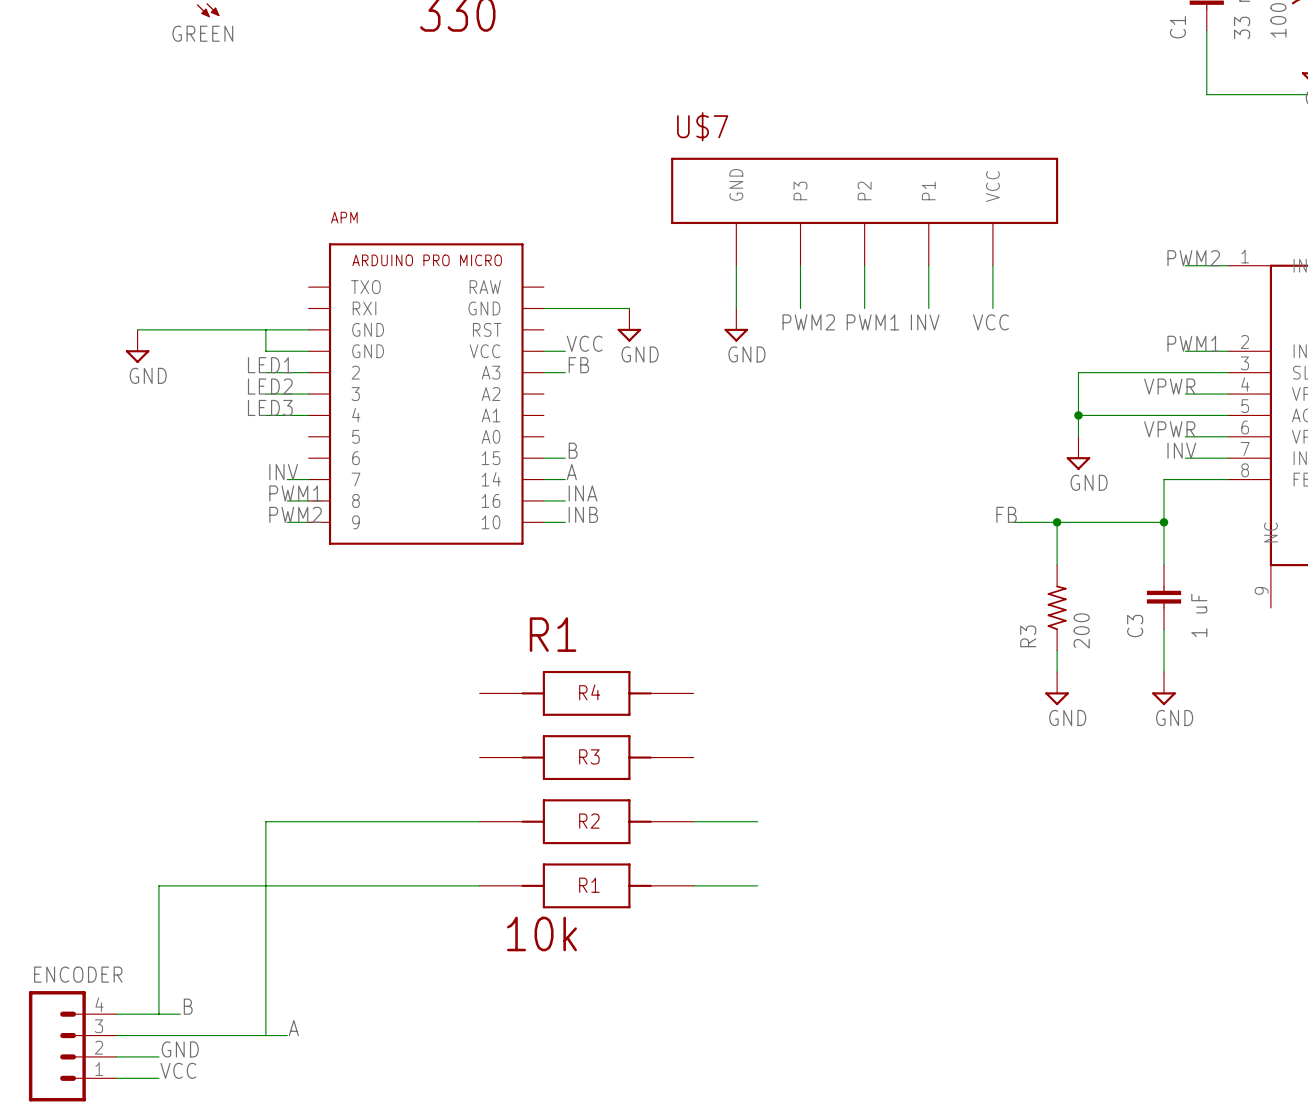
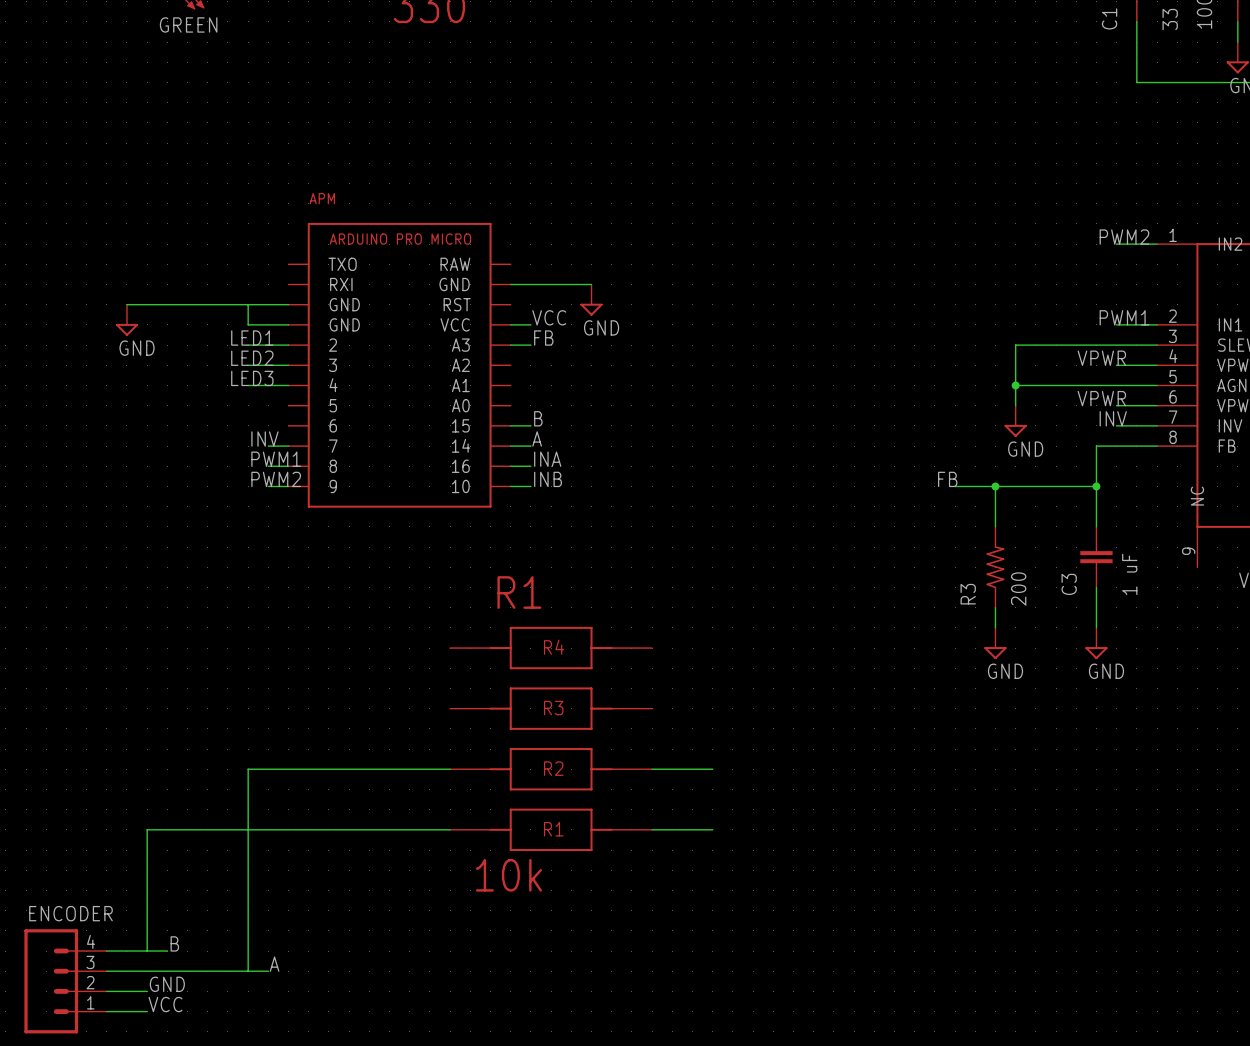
U$7: (864, 211) -> none
wire: (736, 265) (736, 308) -> none
wire: (800, 265) (800, 308) -> none
wire: (864, 265) (864, 308) -> none
wire: (928, 265) (928, 308) -> none
wire: (992, 265) (992, 308) -> none
label: PWM2 (808, 322) -> none
label: PWM1 (872, 322) -> none
label: INV (925, 322) -> none
label: VCC (990, 322) -> none
power symbol: GND (736, 325) -> none

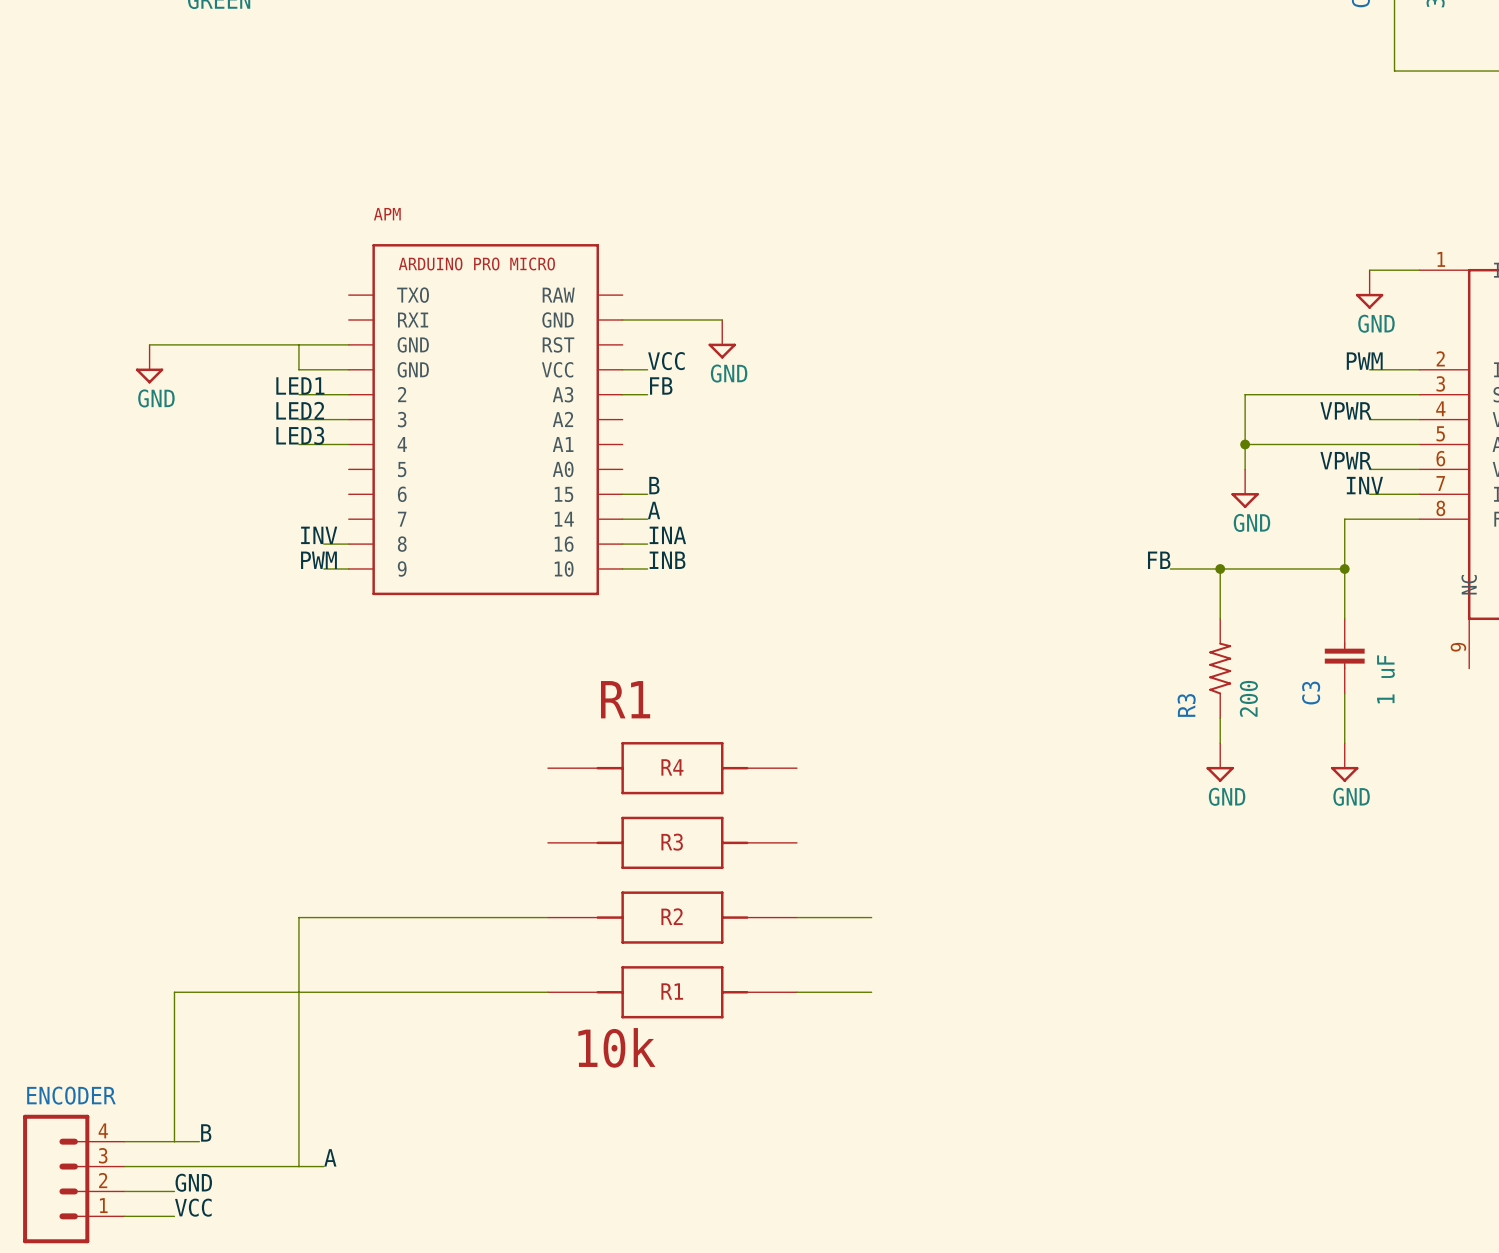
label: PWM2 (1124, 237) -> none
power symbol: none -> GND (1369, 289)
label: PWM1 (1124, 317) -> PWM (1364, 361)
label: INV (264, 439) -> none
wire: (268, 446) (288, 446) -> none
label: PWM1 (276, 459) -> INV (319, 535)
label: PWM2 (276, 479) -> PWM (318, 560)

